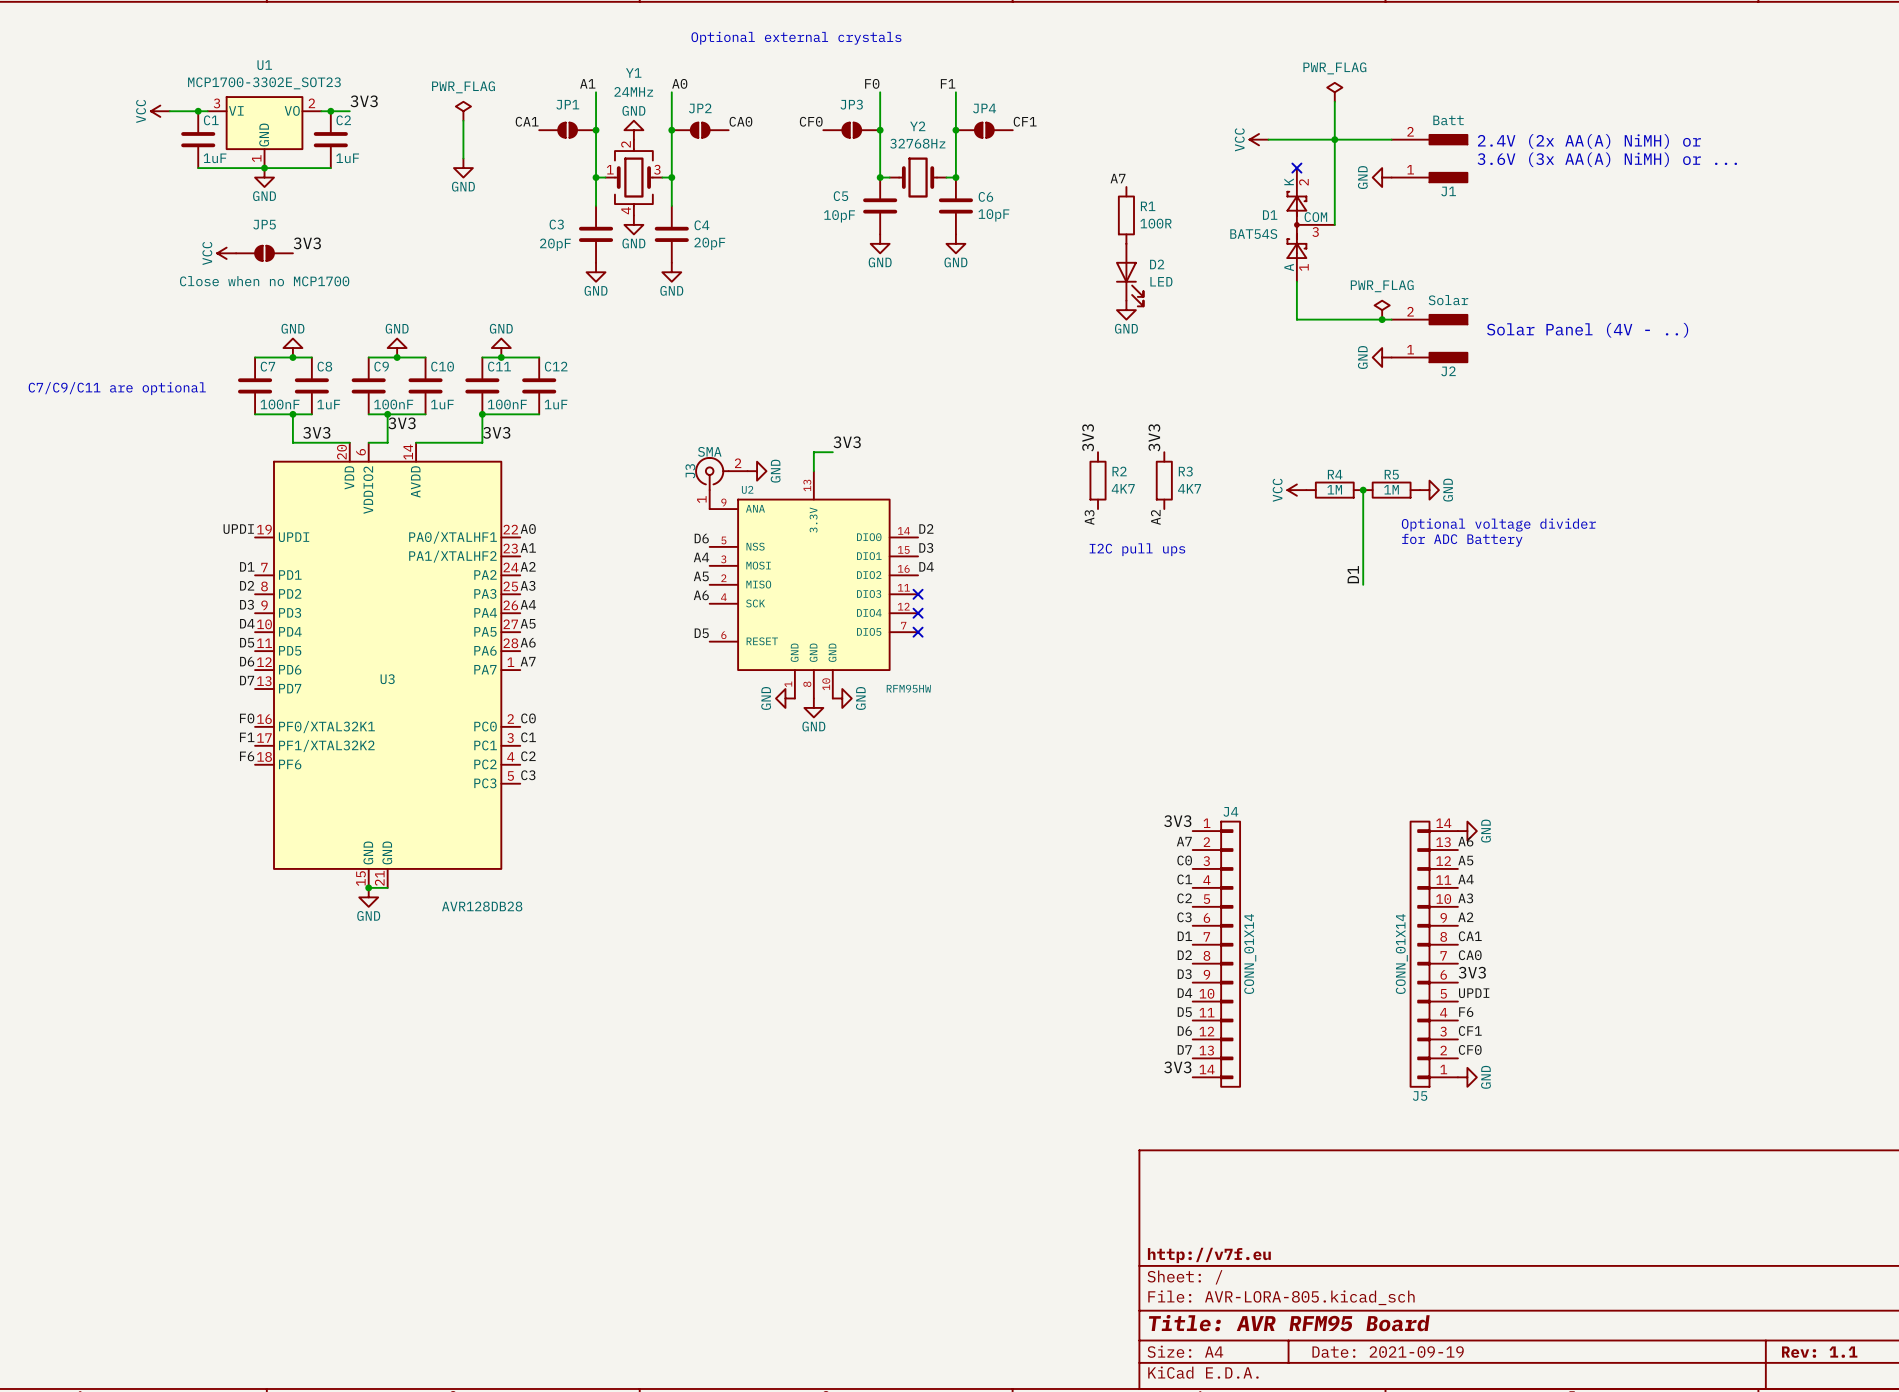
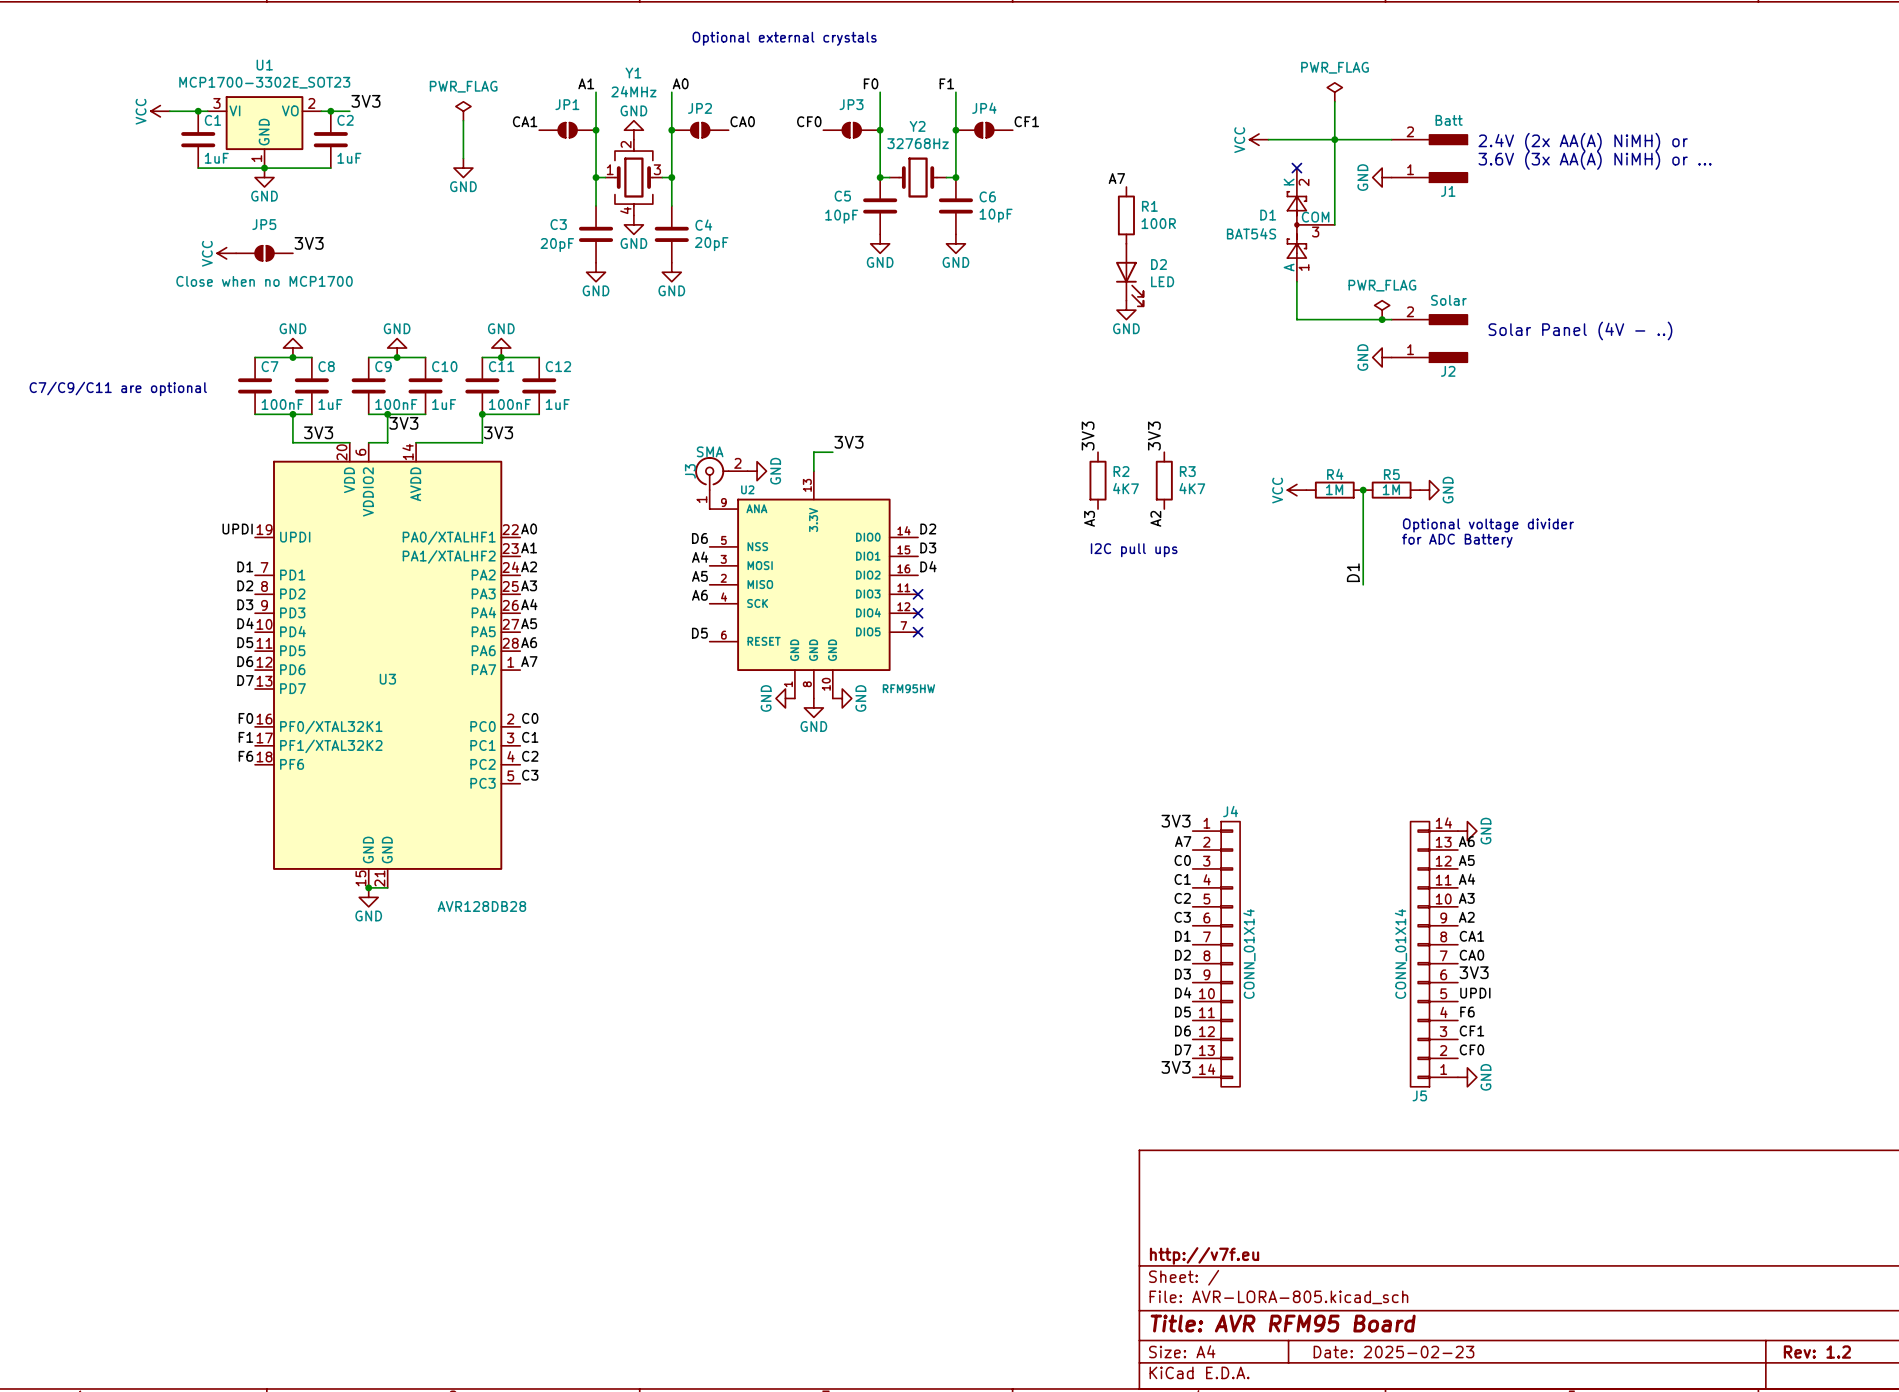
title block: Date: 2021-09-19 (1388, 1352) -> Date: 2025-02-23 (1393, 1352)
title block: Rev: 1.1 (1819, 1352) -> Rev: 1.2 (1817, 1352)

